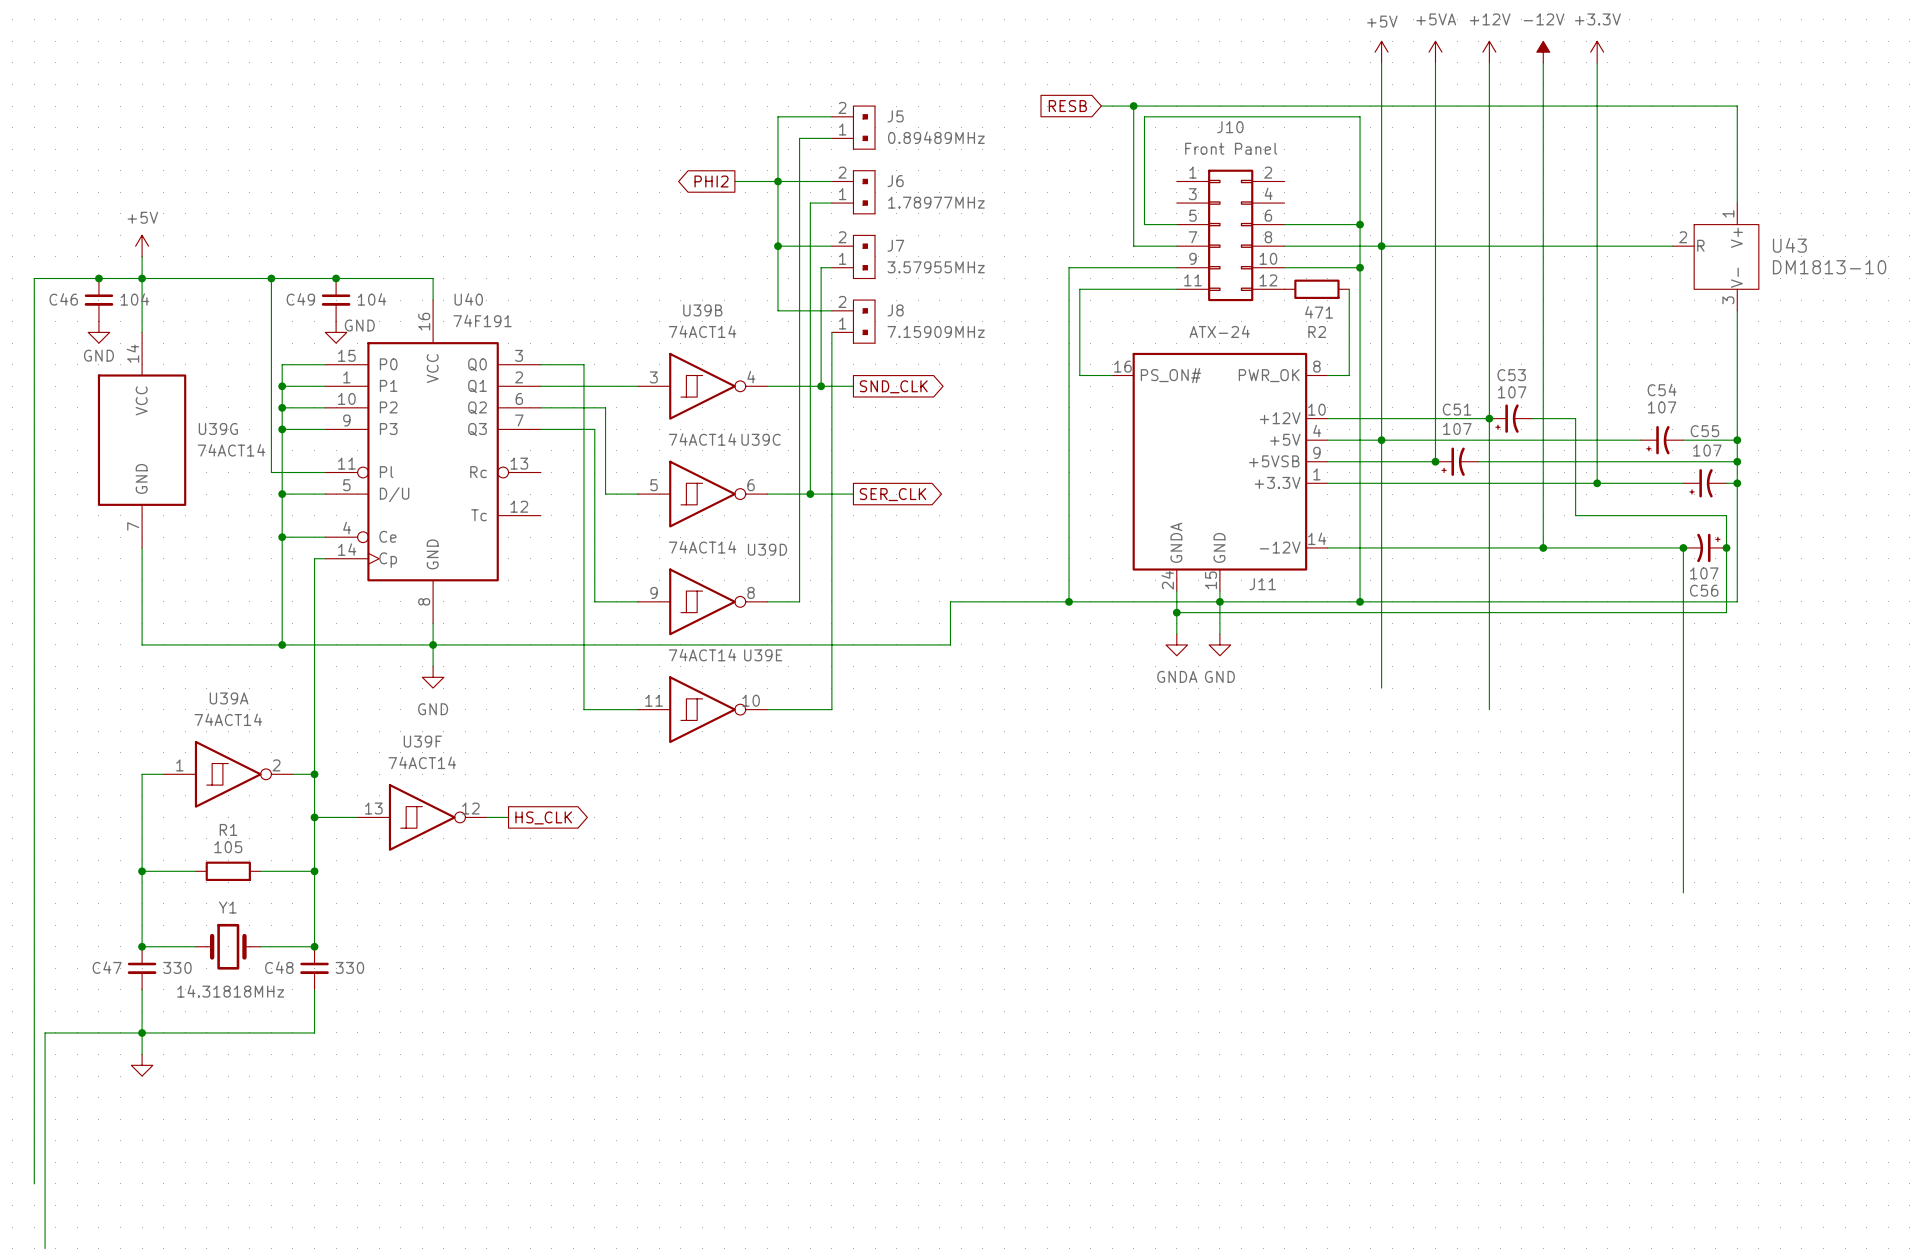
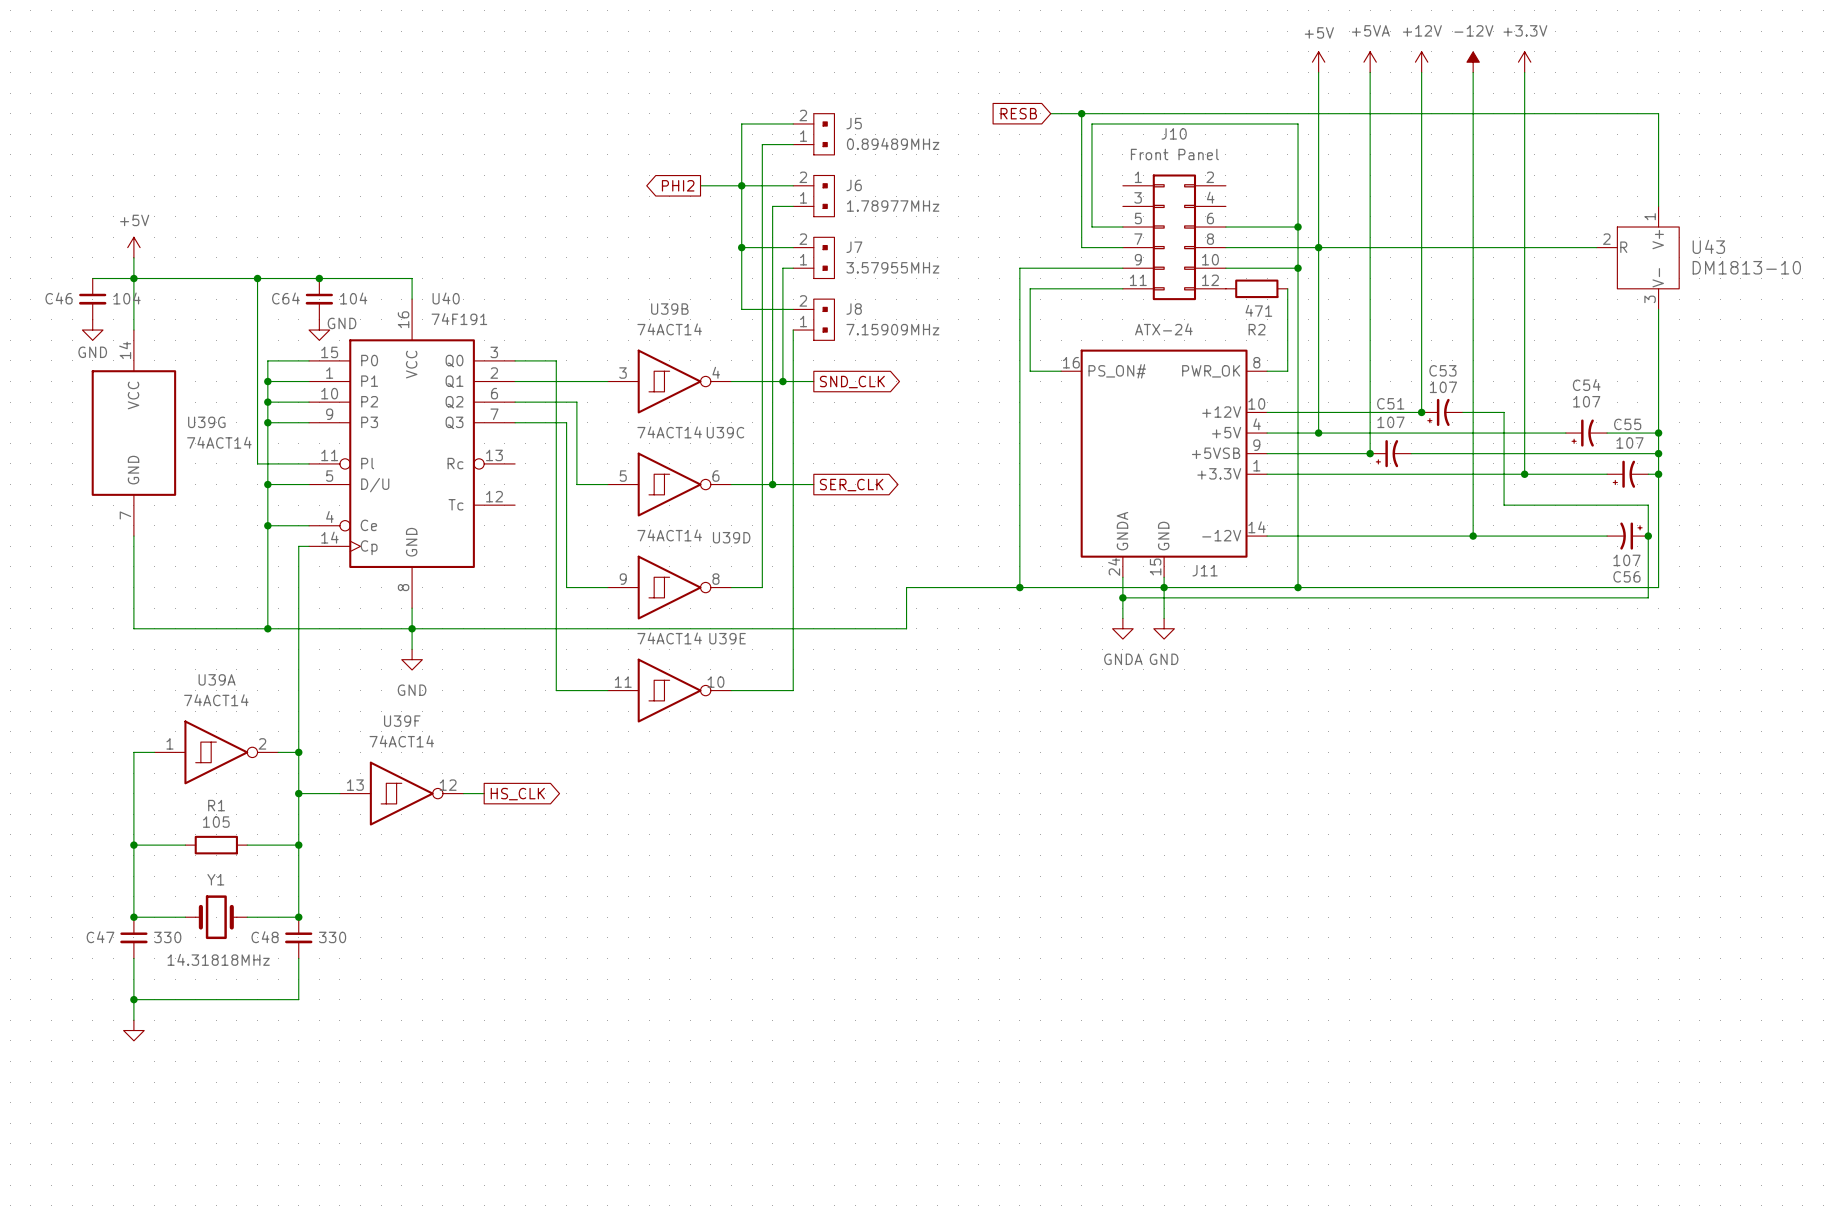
wire: (98, 278) (34, 278) (34, 1183) -> none
junction: (98, 278) -> none
C49 name: C49 (300, 299) -> C64 (285, 298)
wire: (1489, 418) (1489, 709) -> none
wire: (1381, 440) (1381, 688) -> none
wire: (1683, 547) (1683, 892) -> none
junction: (1683, 547) -> none
wire: (142, 1032) (45, 1032) (45, 1248) -> none

